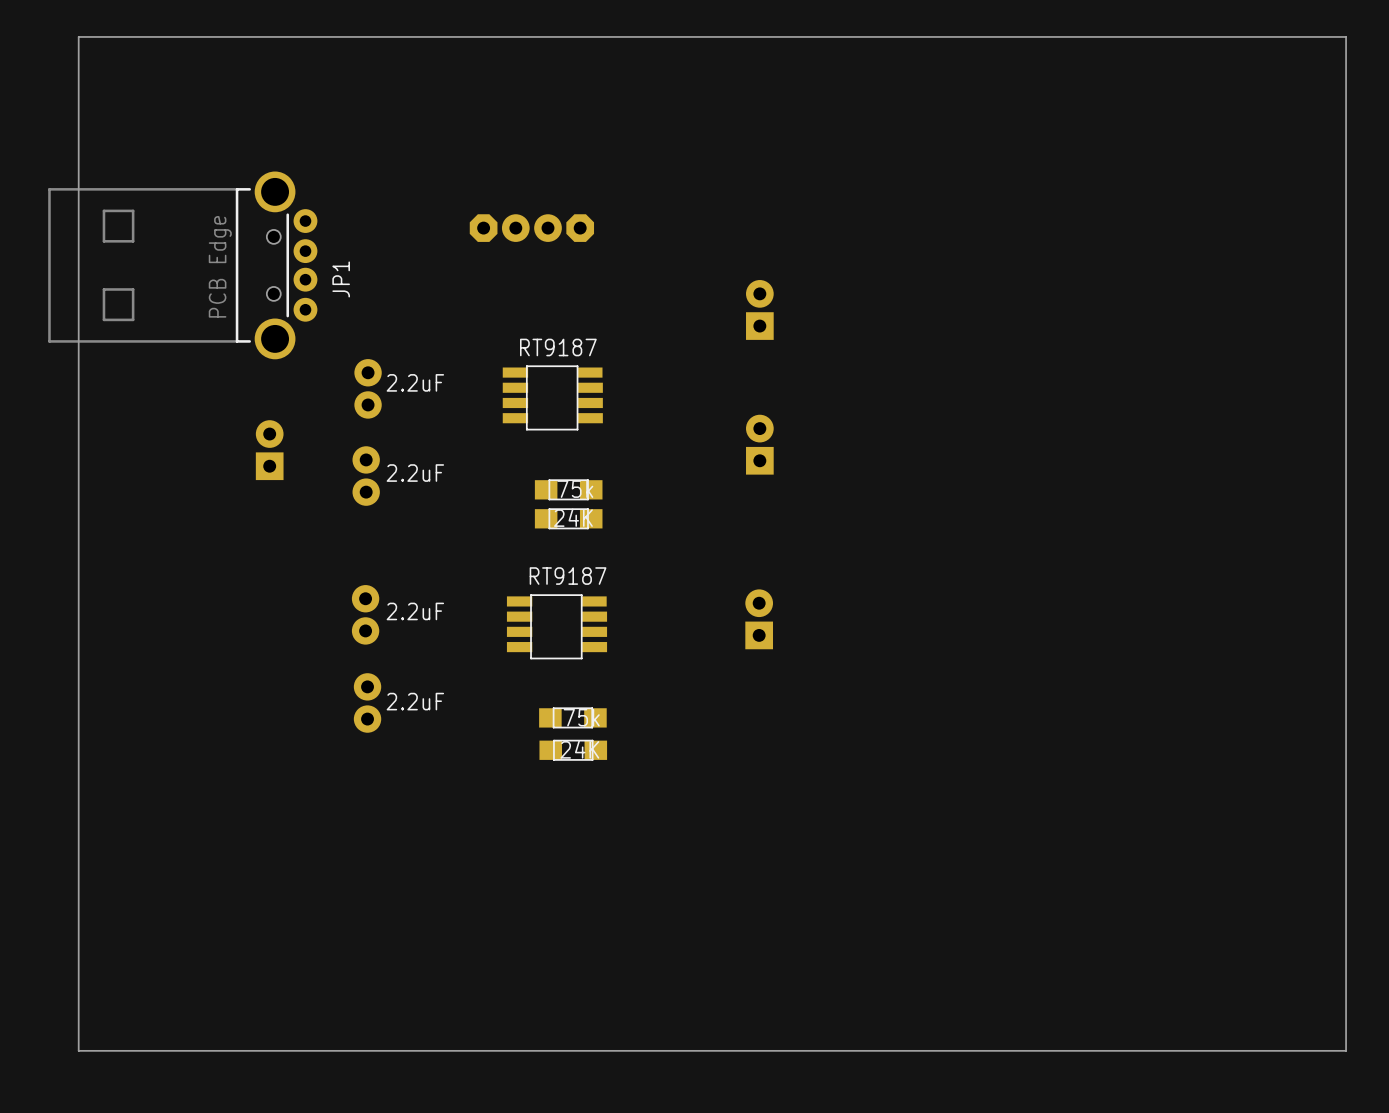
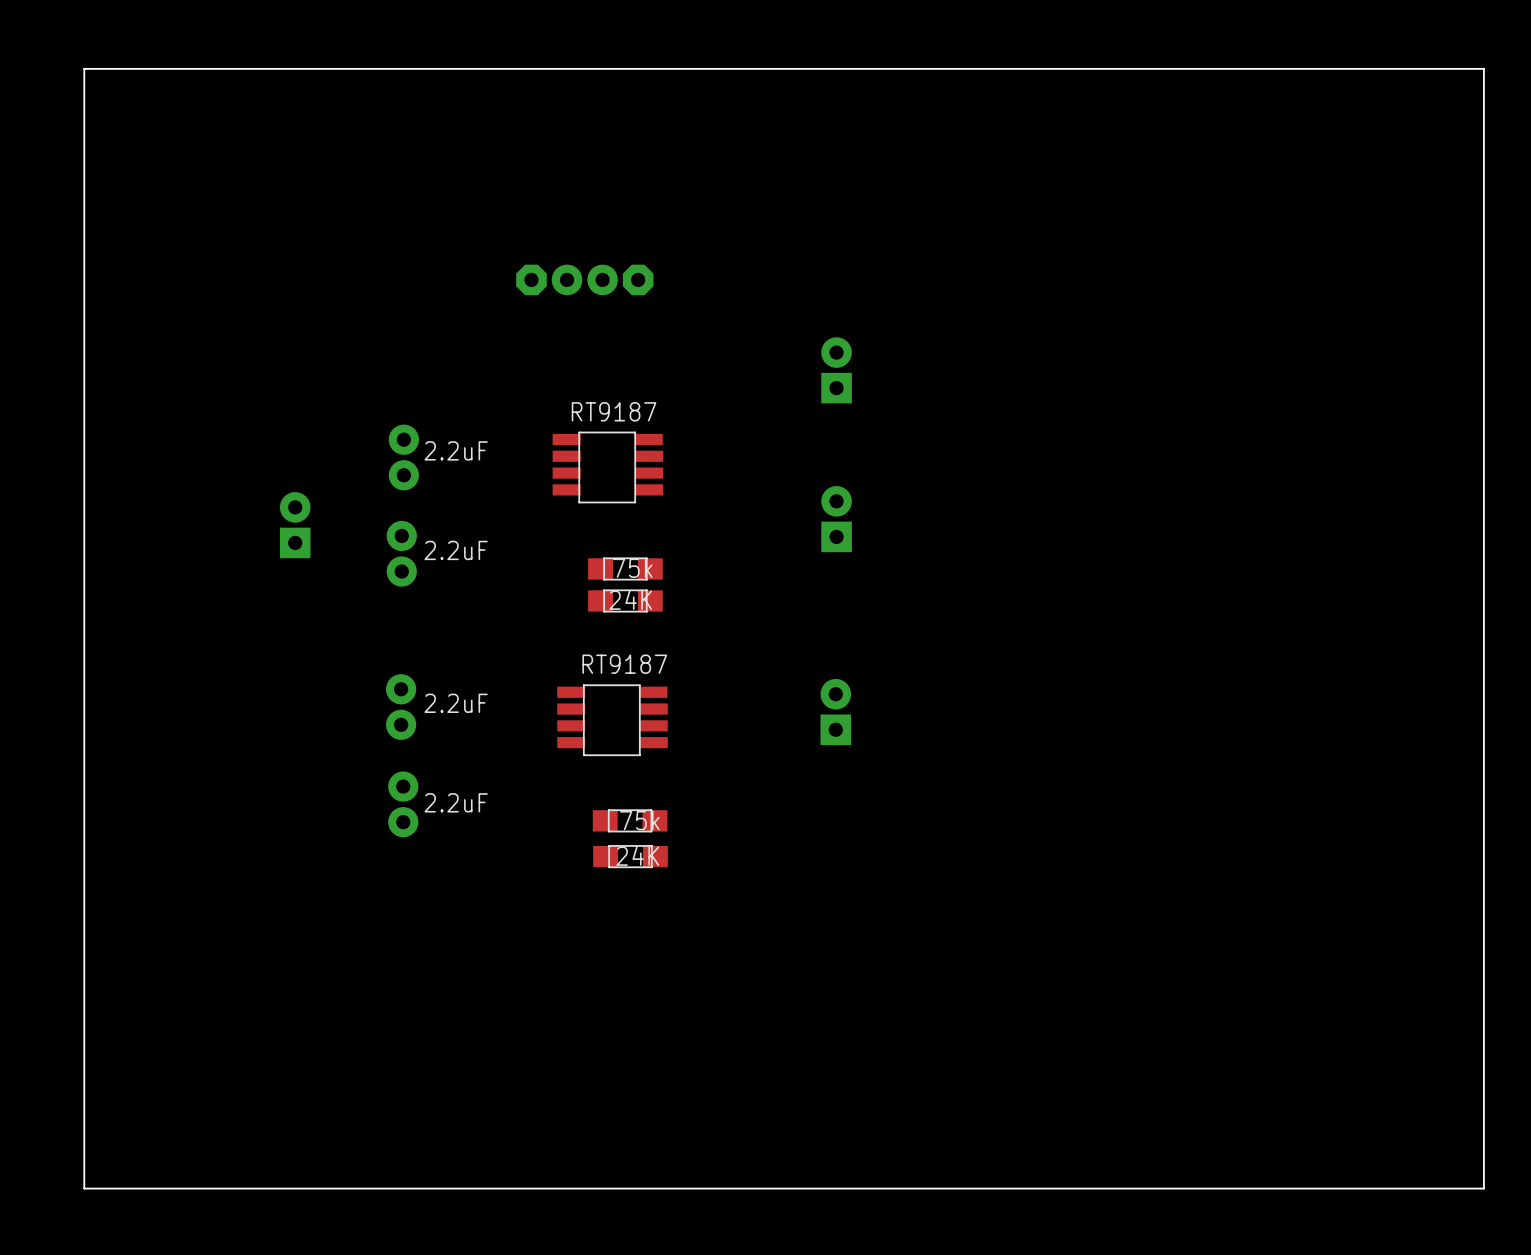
JP1: (182, 265) -> none

